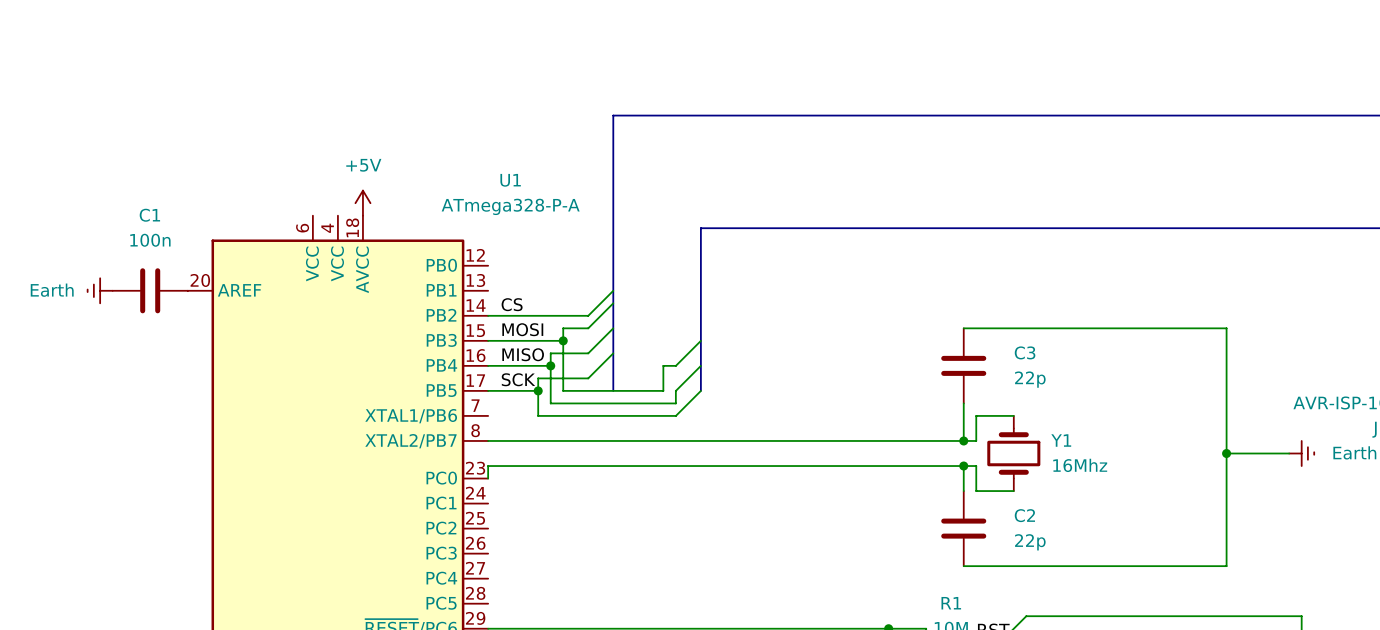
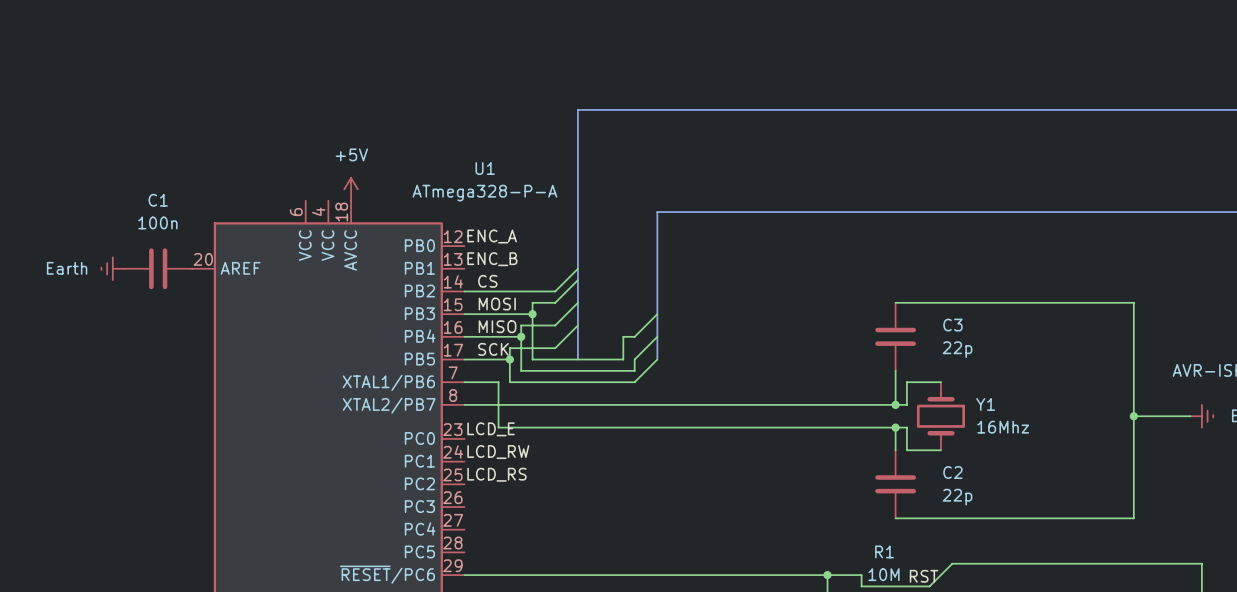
label: none -> ENC_A (492, 236)
label: none -> ENC_B (492, 259)
wire: (525, 466) (488, 466) (488, 478) -> (498, 427) (498, 382) (464, 382)
label: none -> LCD_E (491, 429)
label: none -> LCD_RW (498, 452)
label: none -> LCD_RS (497, 474)

